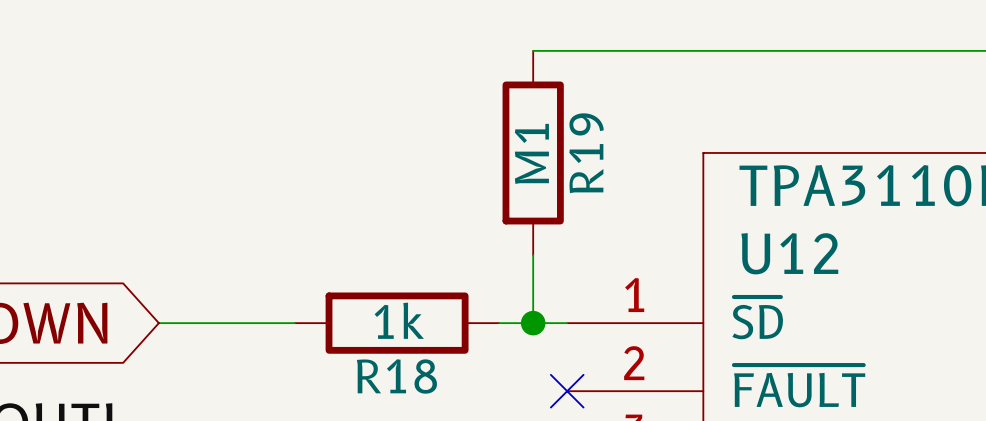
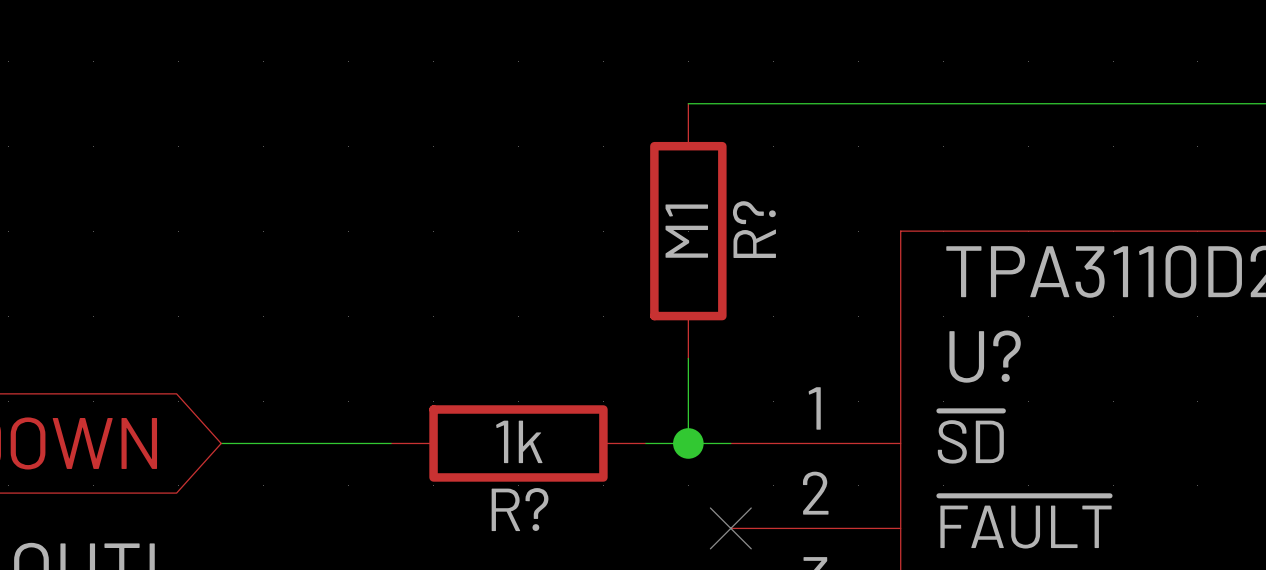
R19 name: R19 (586, 153) -> R? (754, 229)
U12 name: U12 (789, 253) -> U? (985, 356)
R18 name: R18 (396, 376) -> R? (520, 509)

